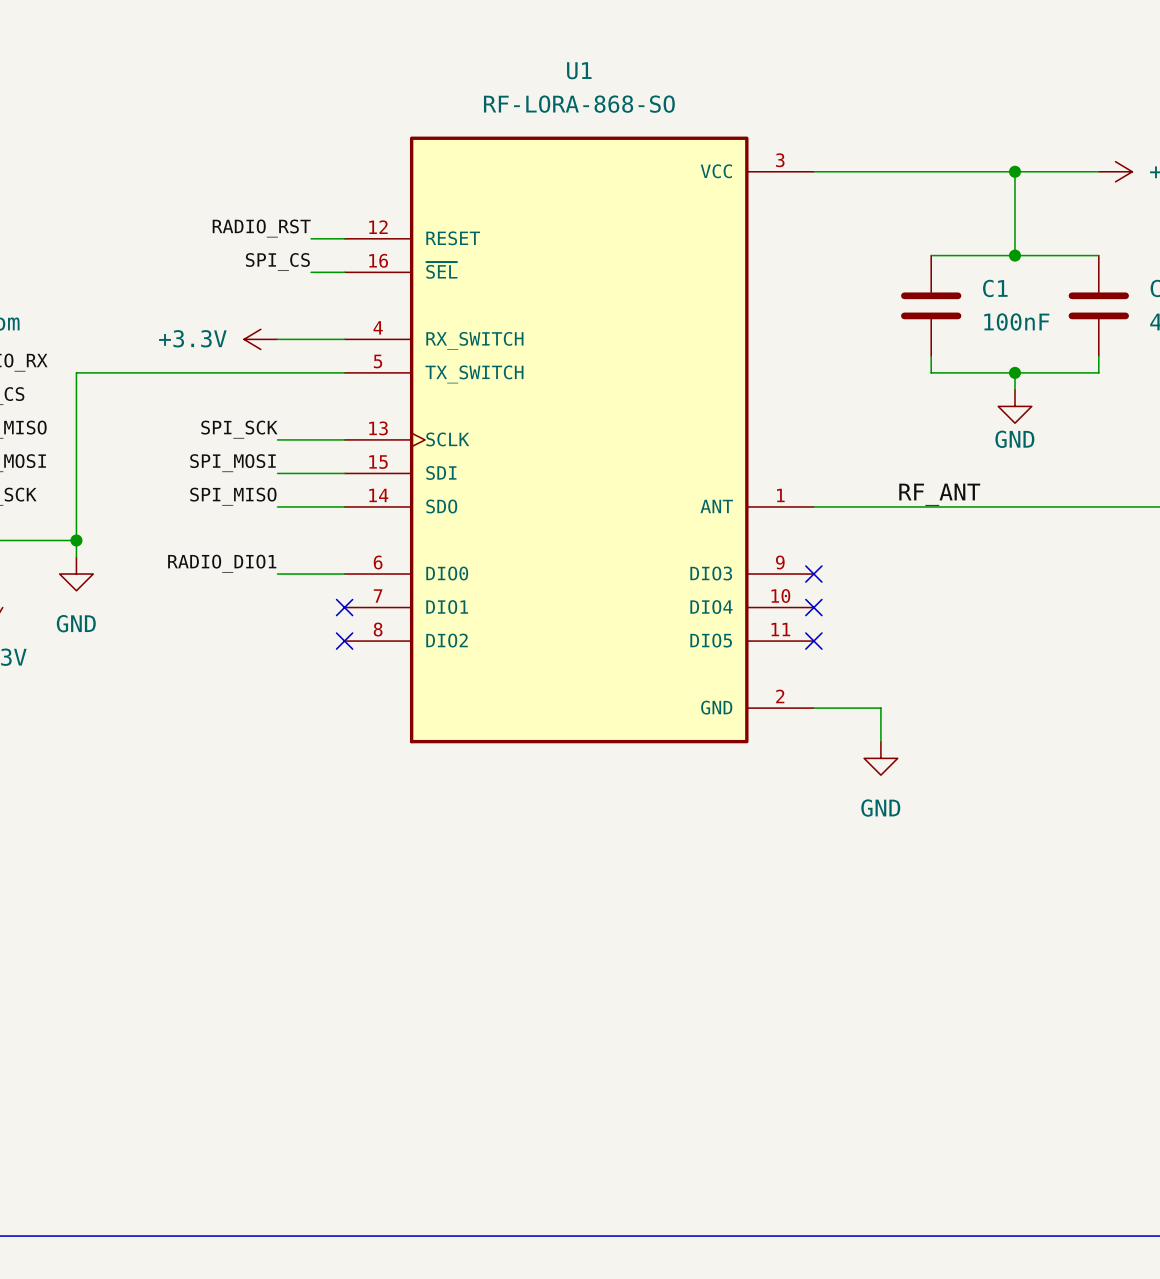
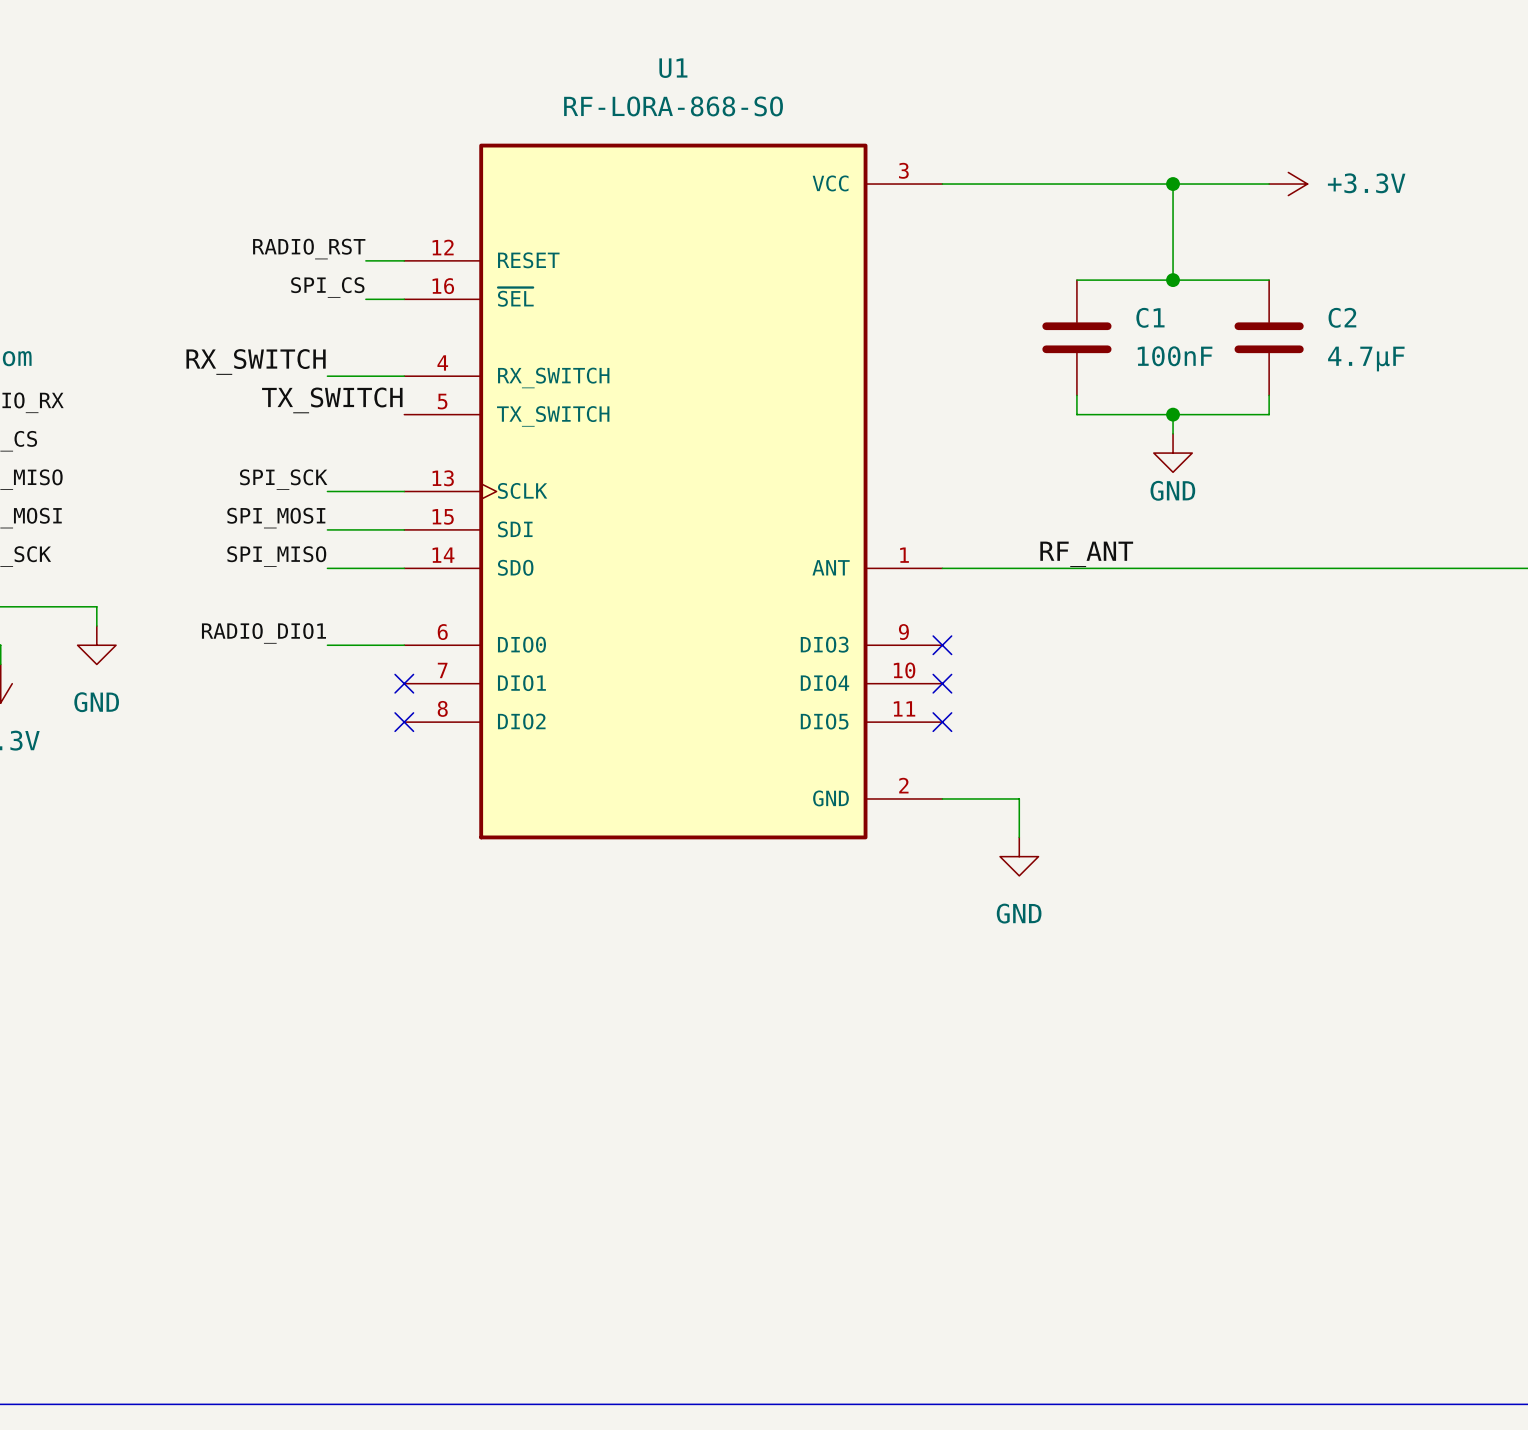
label: none -> RX_SWITCH (256, 361)
power symbol: +3.3V (260, 339) -> none
label: none -> TX_SWITCH (332, 400)
wire: (344, 372) (76, 372) (76, 540) -> none
junction: (76, 540) -> none

